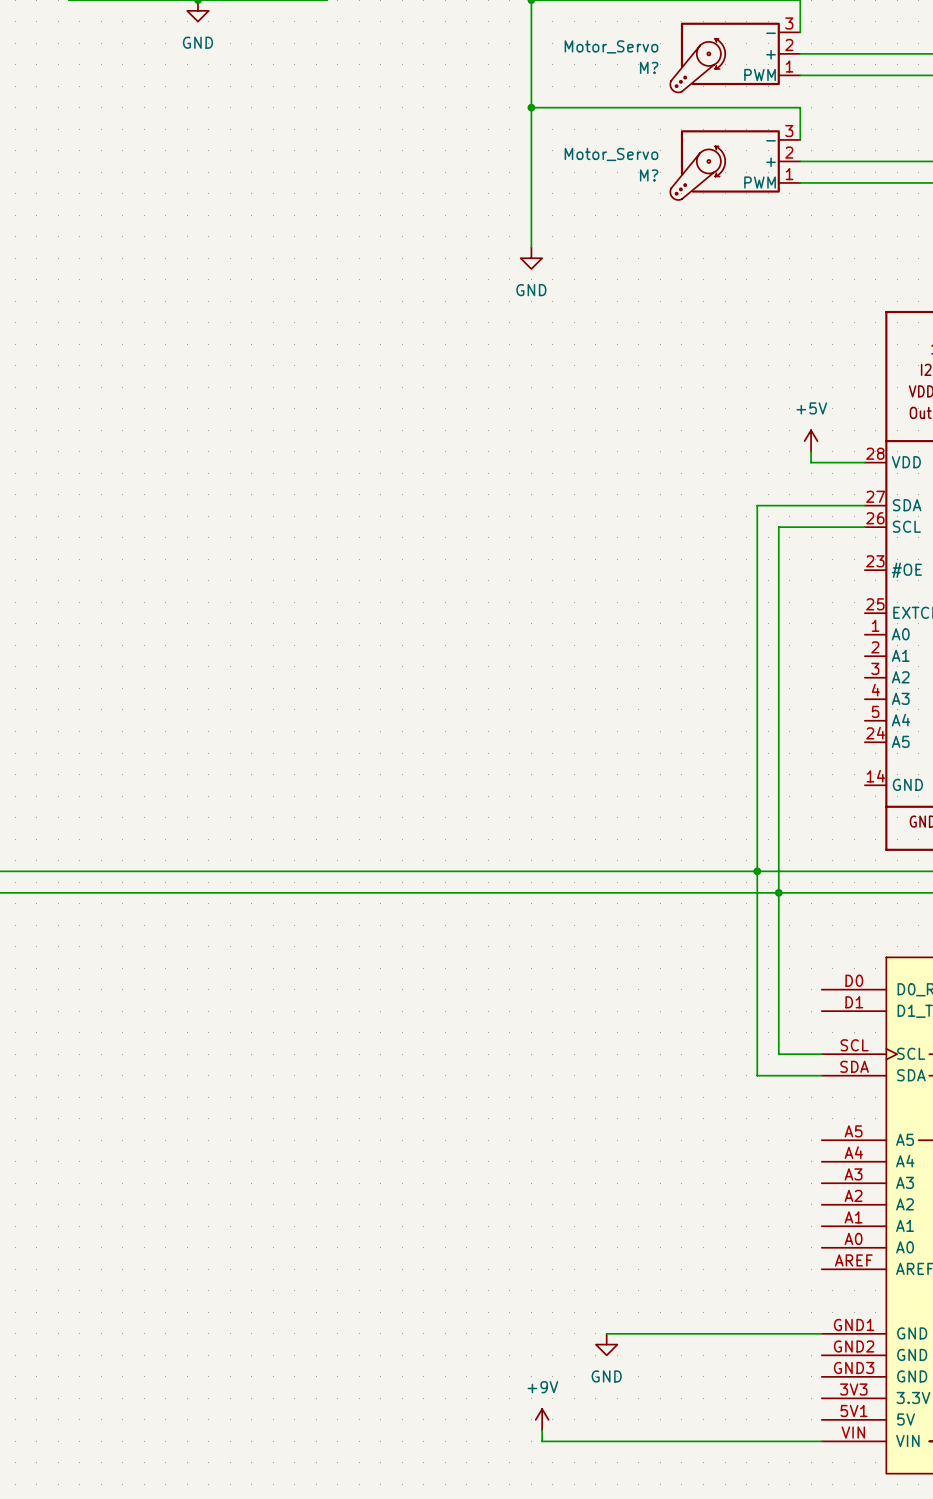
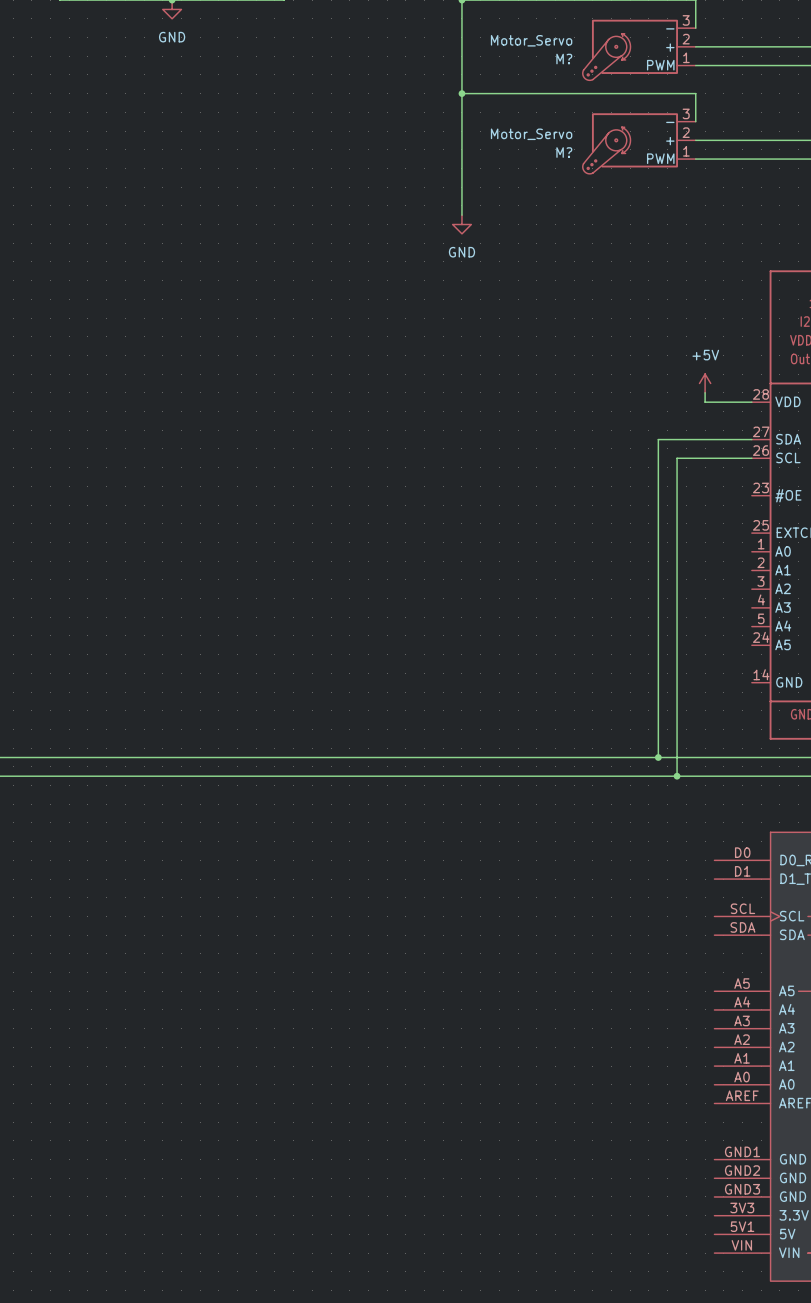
wire: (757, 871) (757, 1075) (821, 1075) -> none
wire: (778, 892) (778, 1054) (821, 1054) -> none
wire: (606, 1333) (821, 1333) -> none
power symbol: GND (606, 1344) -> none
power symbol: +9V (542, 1419) -> none
wire: (542, 1430) (542, 1441) (821, 1441) -> none

